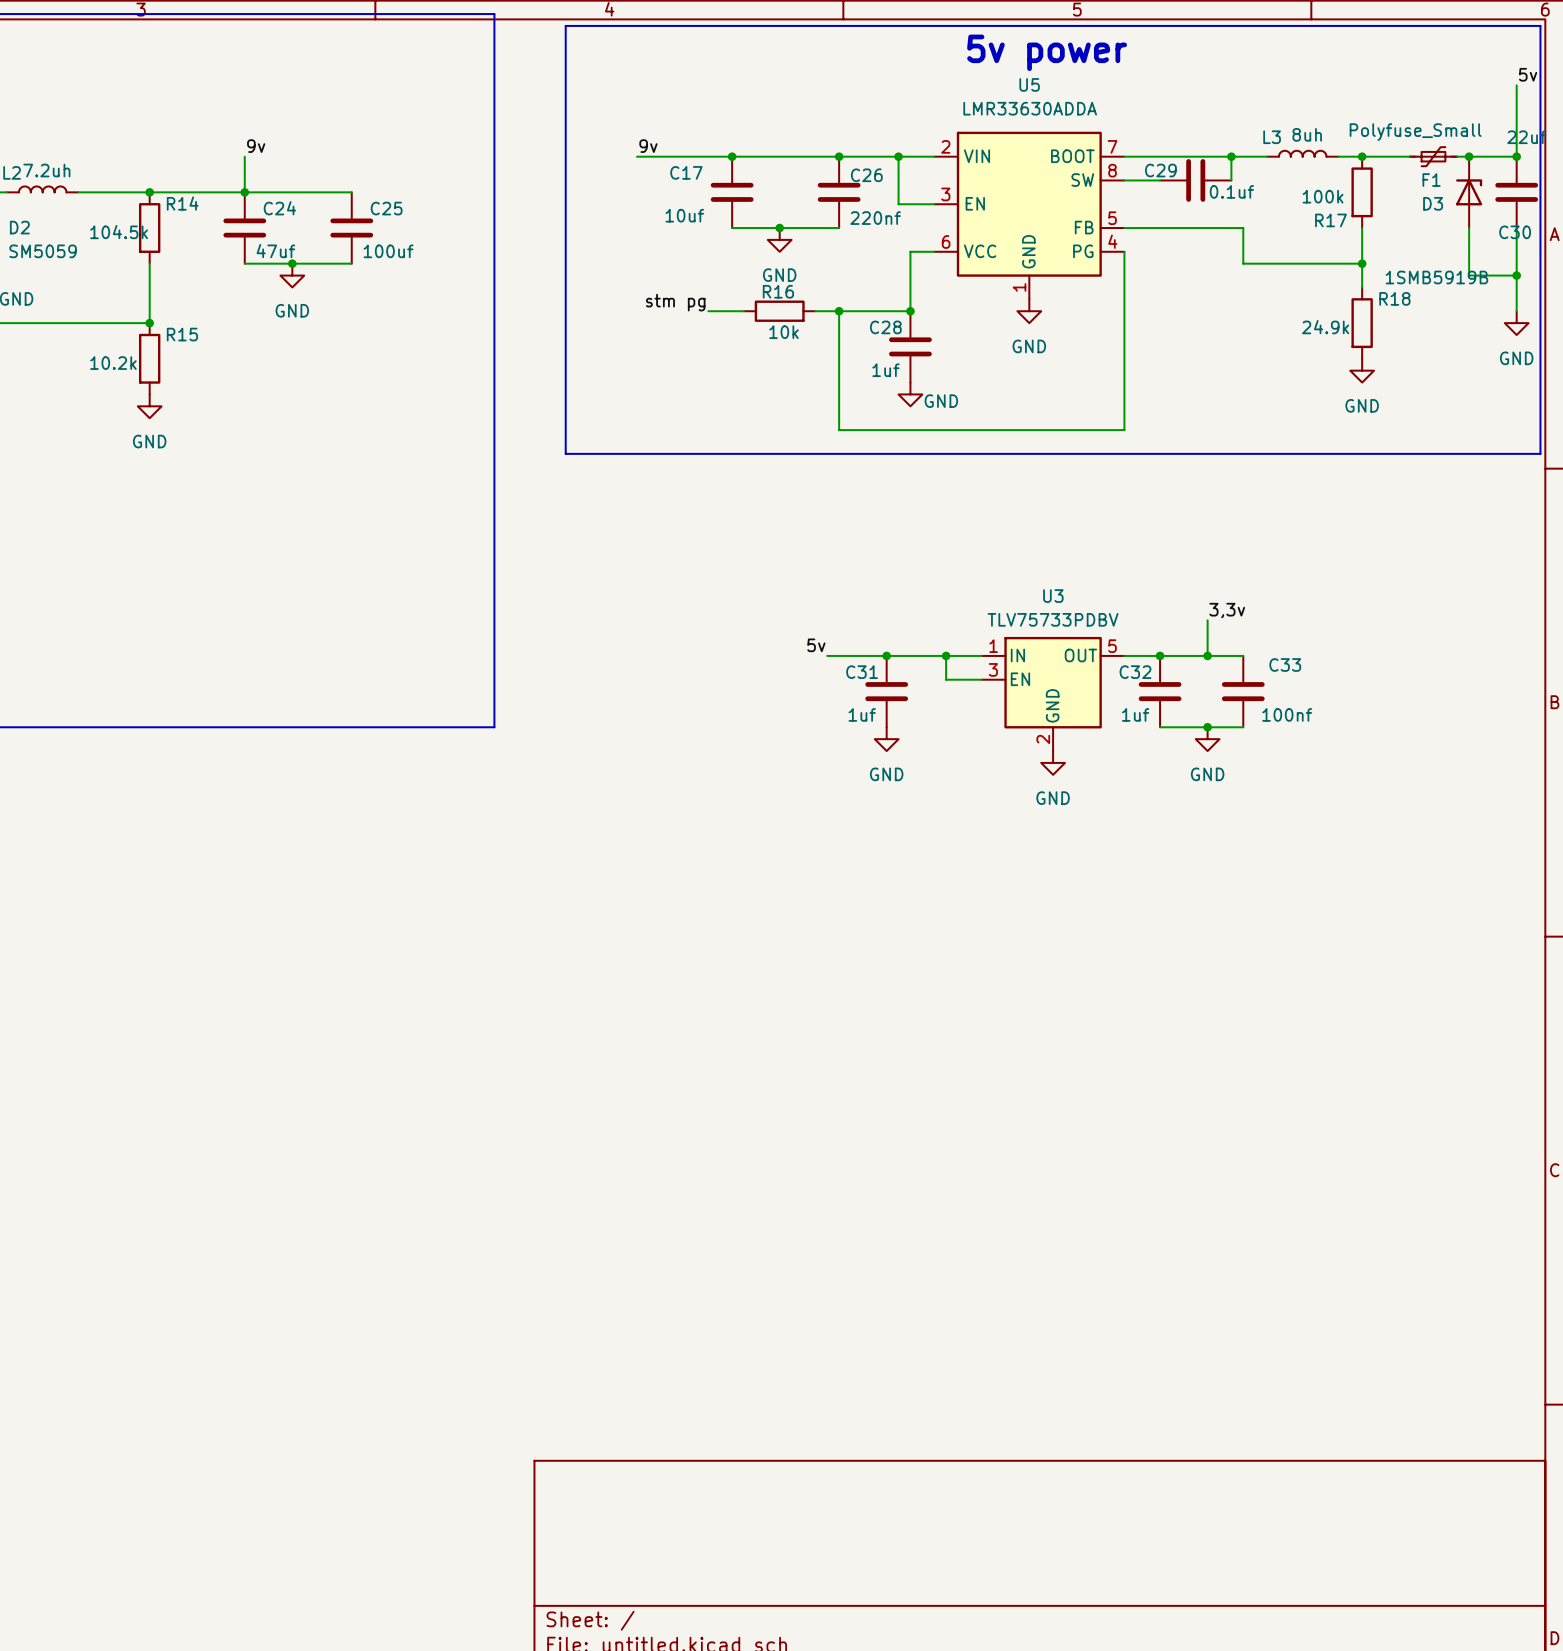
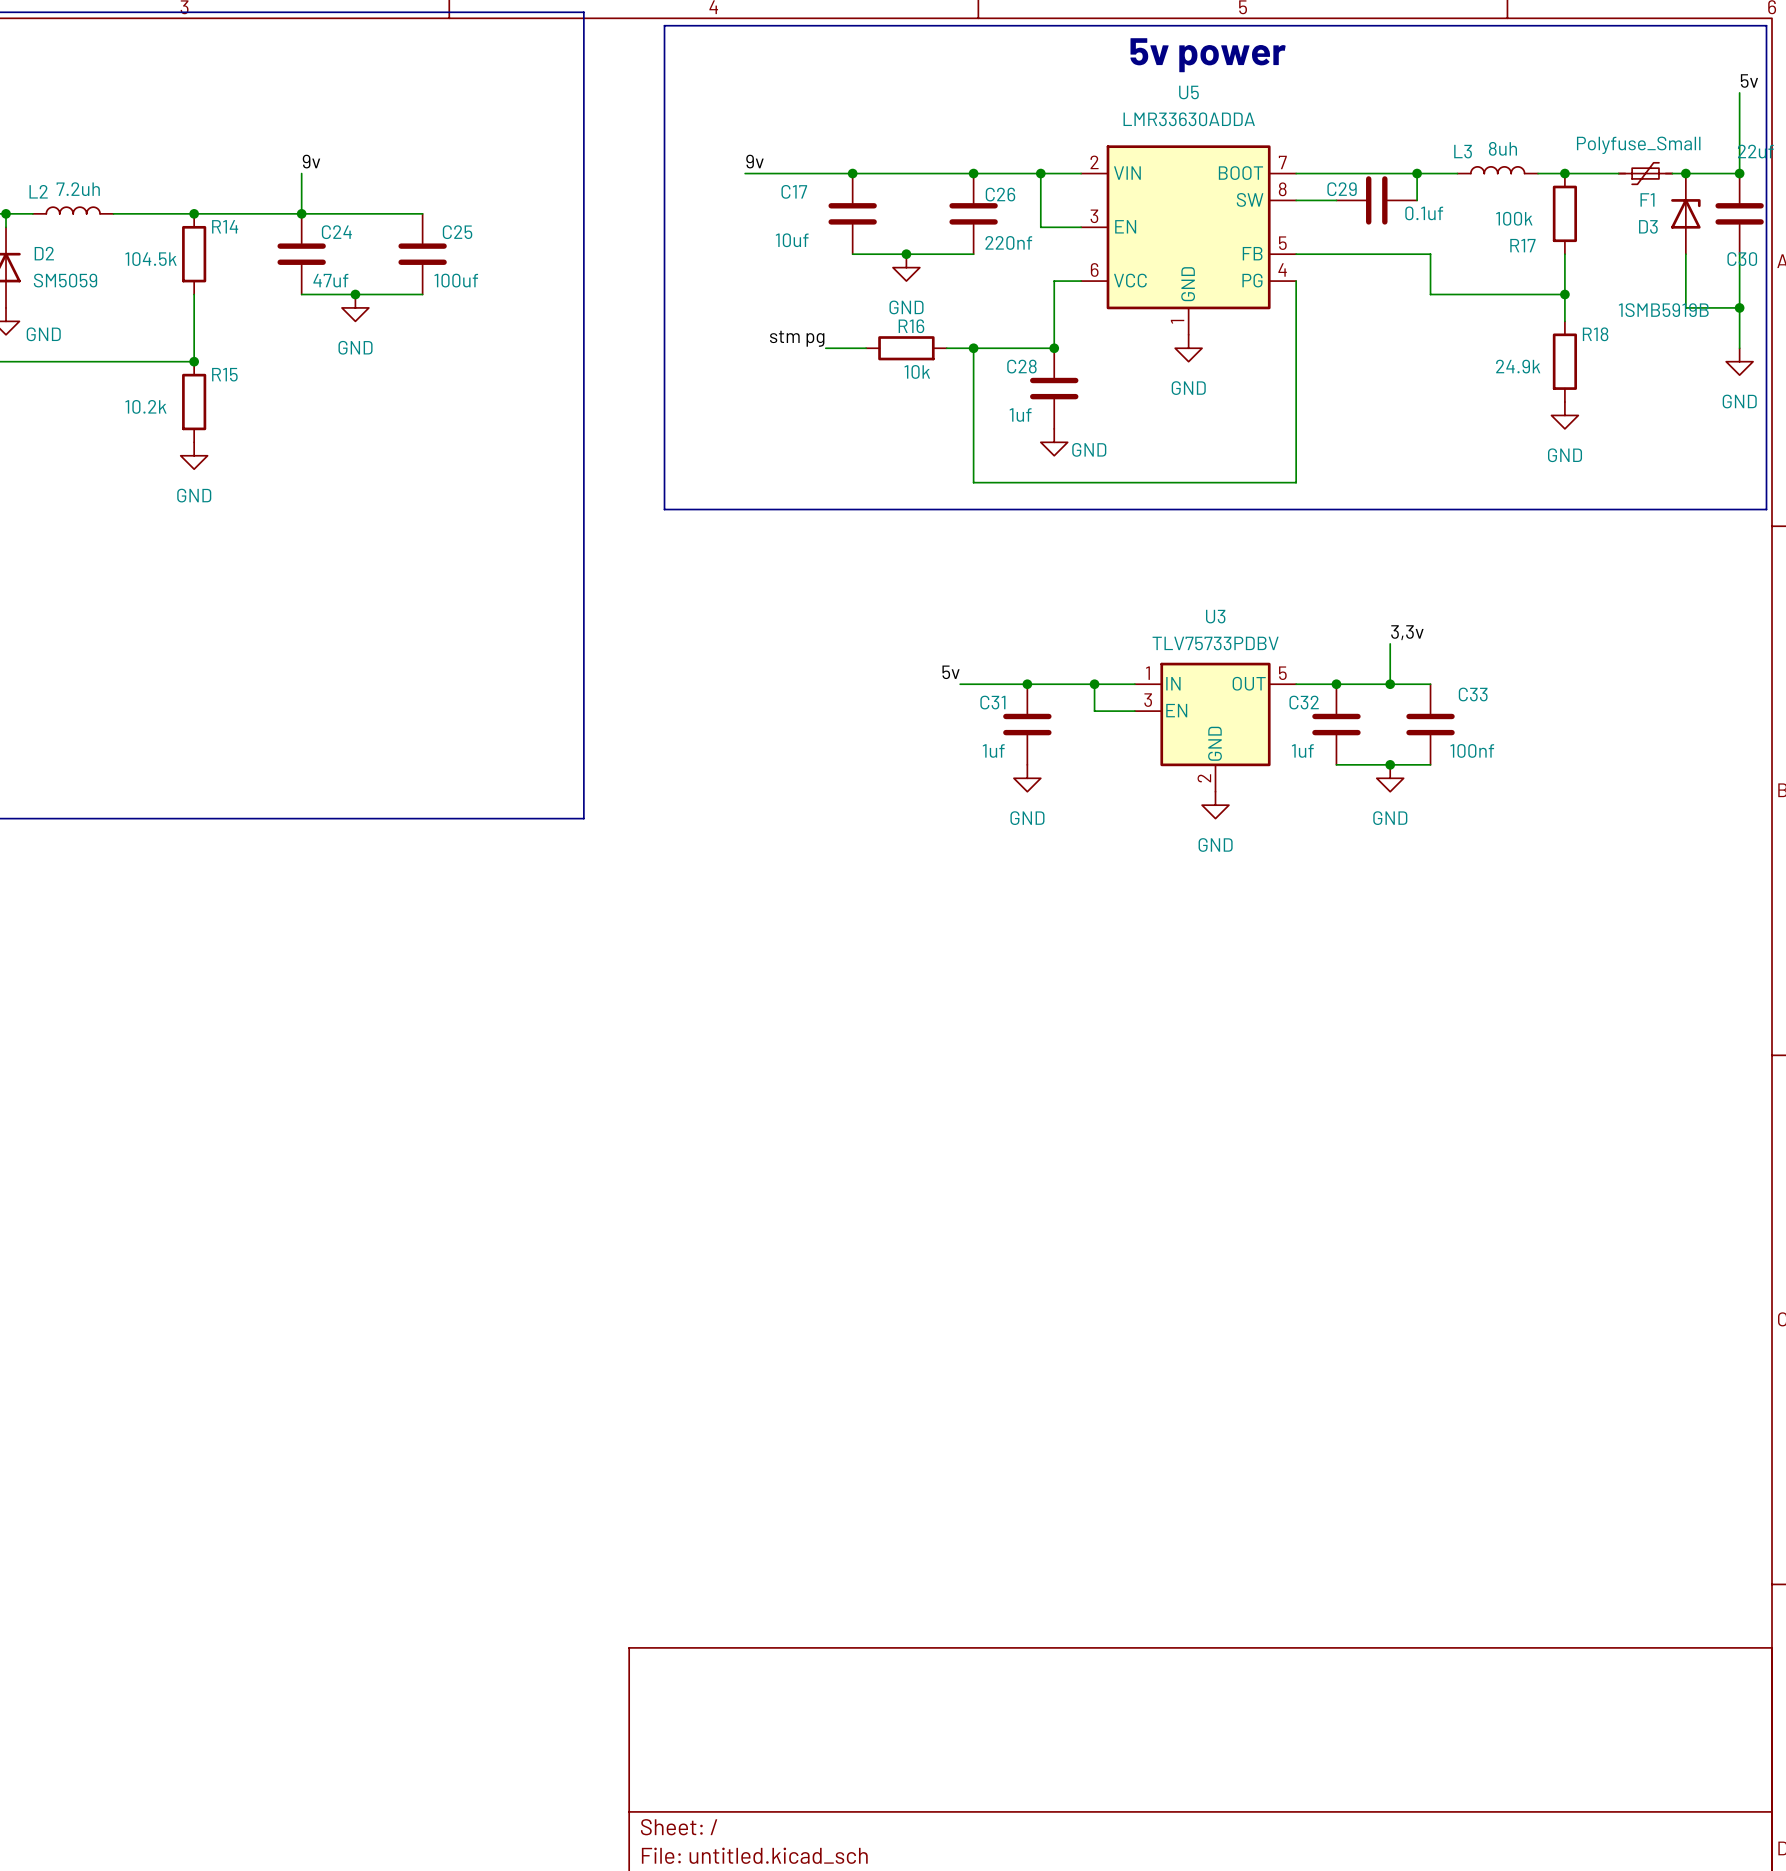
junction: none -> (1027, 684)
junction: none -> (1094, 684)
junction: none -> (1336, 684)
junction: none -> (1390, 684)
label position: 3,3v (1227, 610) -> 3,3v (1407, 632)
wire: (1207, 620) (1207, 655) -> (1390, 643) (1390, 684)
label position: 5v (816, 645) -> 5v (951, 672)
wire: (827, 655) (981, 655) -> (960, 684) (1134, 684)
junction: (886, 655) -> none
wire: (946, 655) (946, 679) (981, 679) -> (1094, 684) (1094, 711) (1134, 711)
junction: (946, 655) -> none
wire: (1124, 655) (1243, 655) -> (1296, 684) (1430, 684)
junction: (1160, 655) -> none
junction: (1207, 655) -> none
junction: none -> (1390, 764)
C31 position: (886, 691) -> (1027, 724)
C32 position: (1160, 691) -> (1336, 724)
C33 position: (1243, 691) -> (1430, 724)
U3 position: (1053, 693) -> (1215, 727)
wire: (1160, 727) (1243, 727) -> (1336, 764) (1430, 764)
junction: (1207, 727) -> none
power symbol position: GND (886, 739) -> GND (1027, 778)
power symbol position: GND (1207, 739) -> GND (1390, 778)
power symbol position: GND (1053, 762) -> GND (1215, 805)

